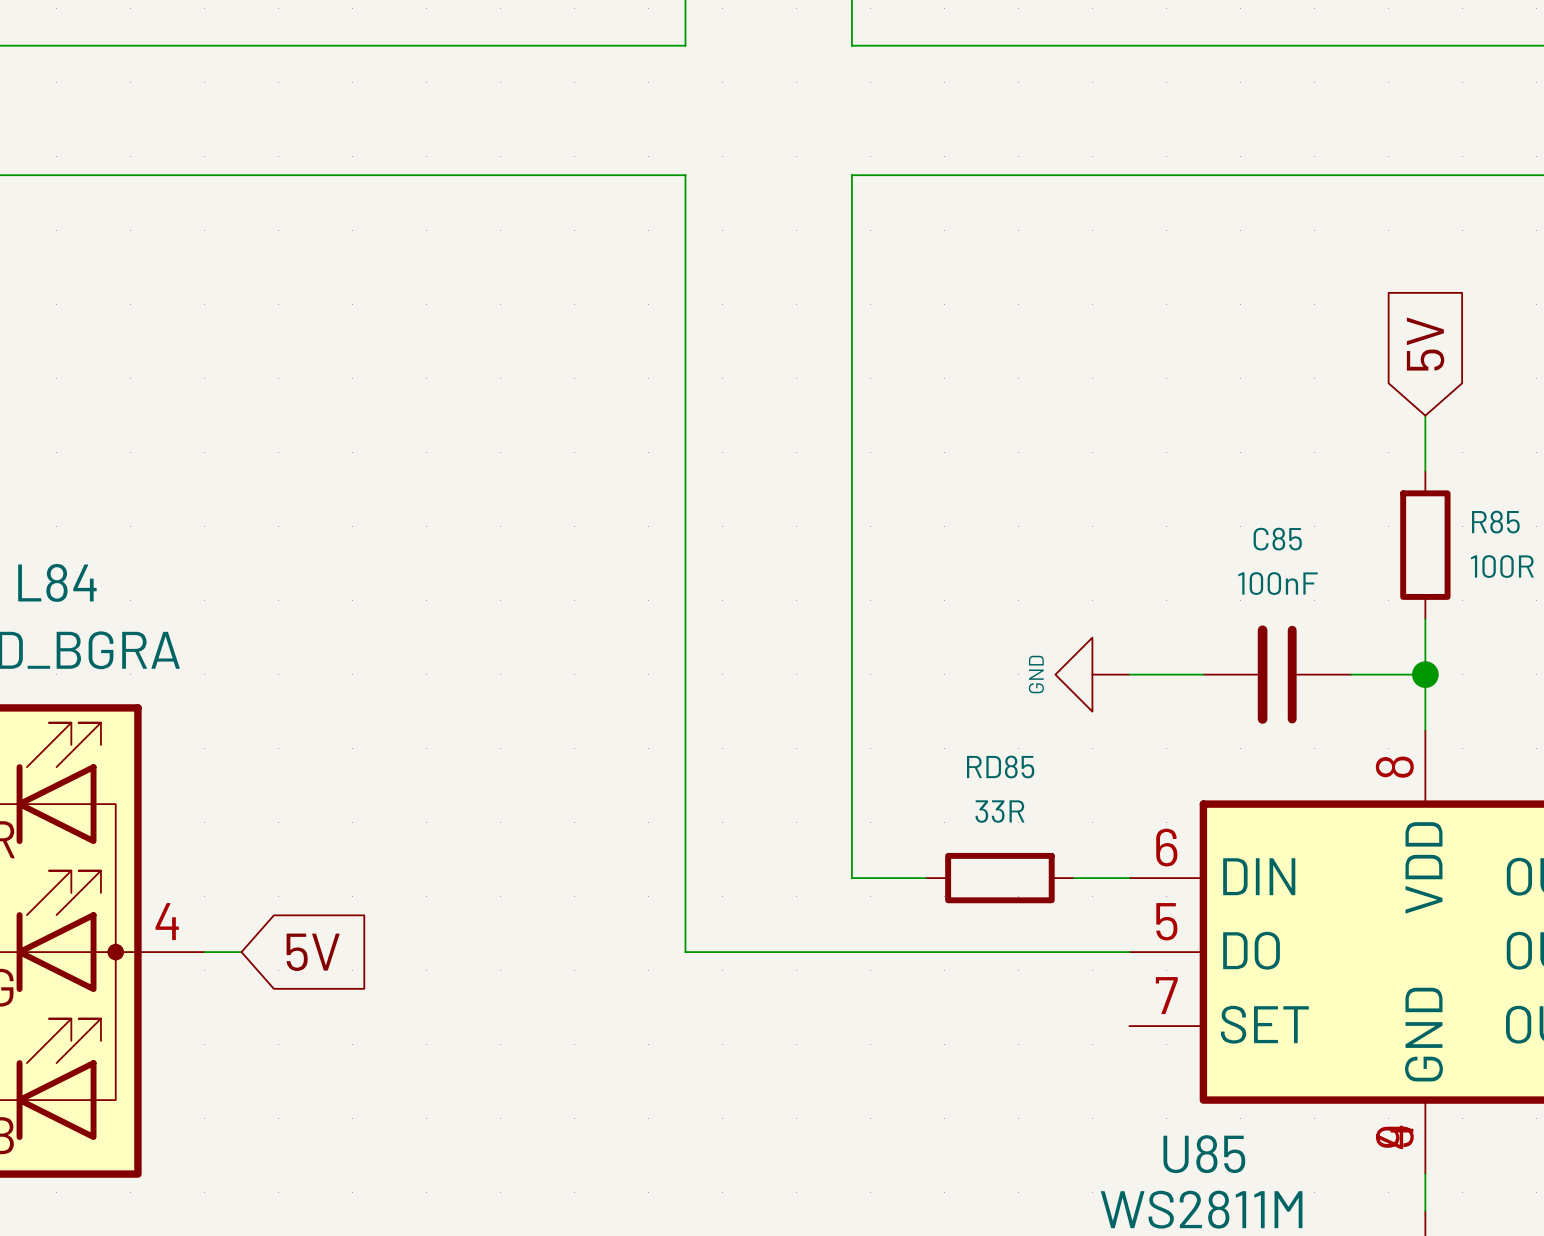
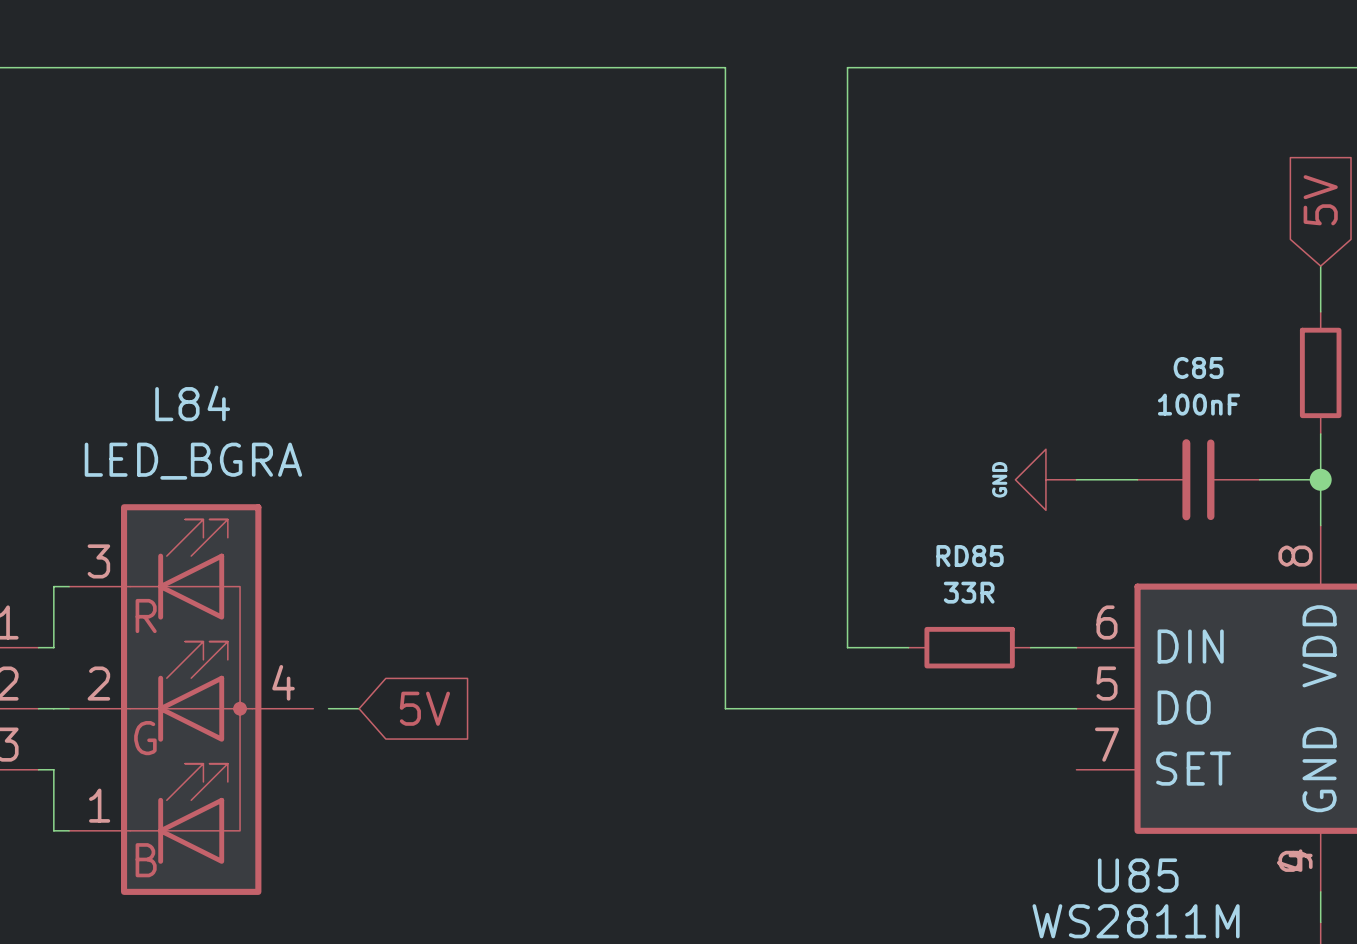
wire: (685, 175) (685, 952) (703, 952) -> (710, 67) (725, 67) (725, 708)
wire: (204, 952) (223, 952) -> (343, 708) (359, 708)
global label position: 5V (313, 952) -> 5V (424, 708)

